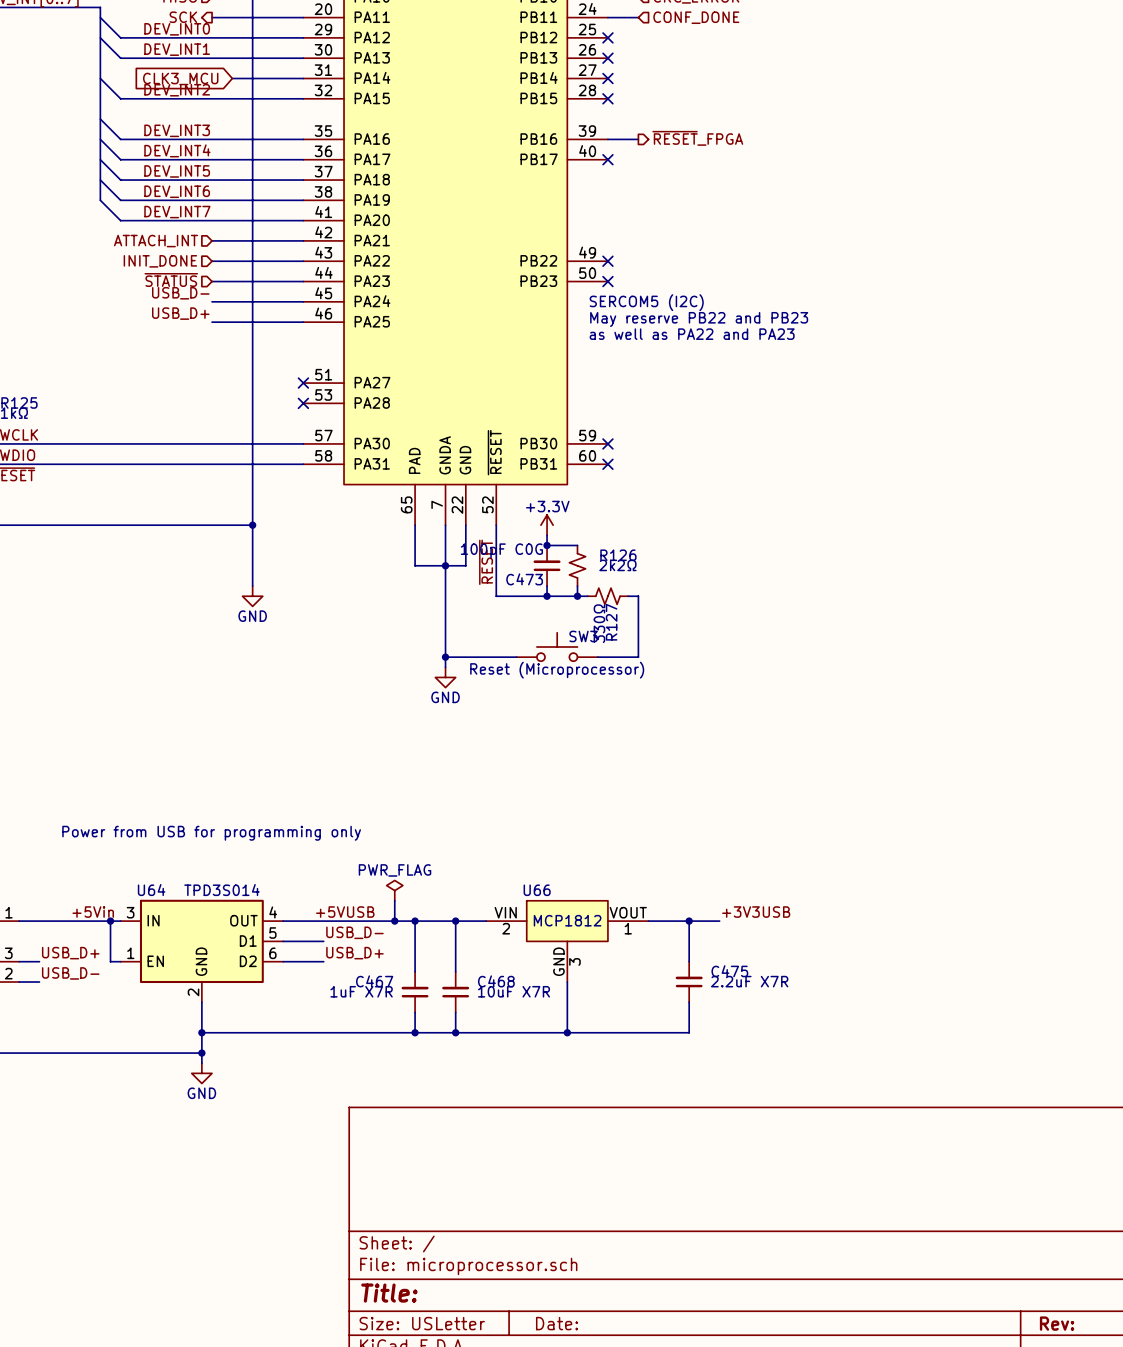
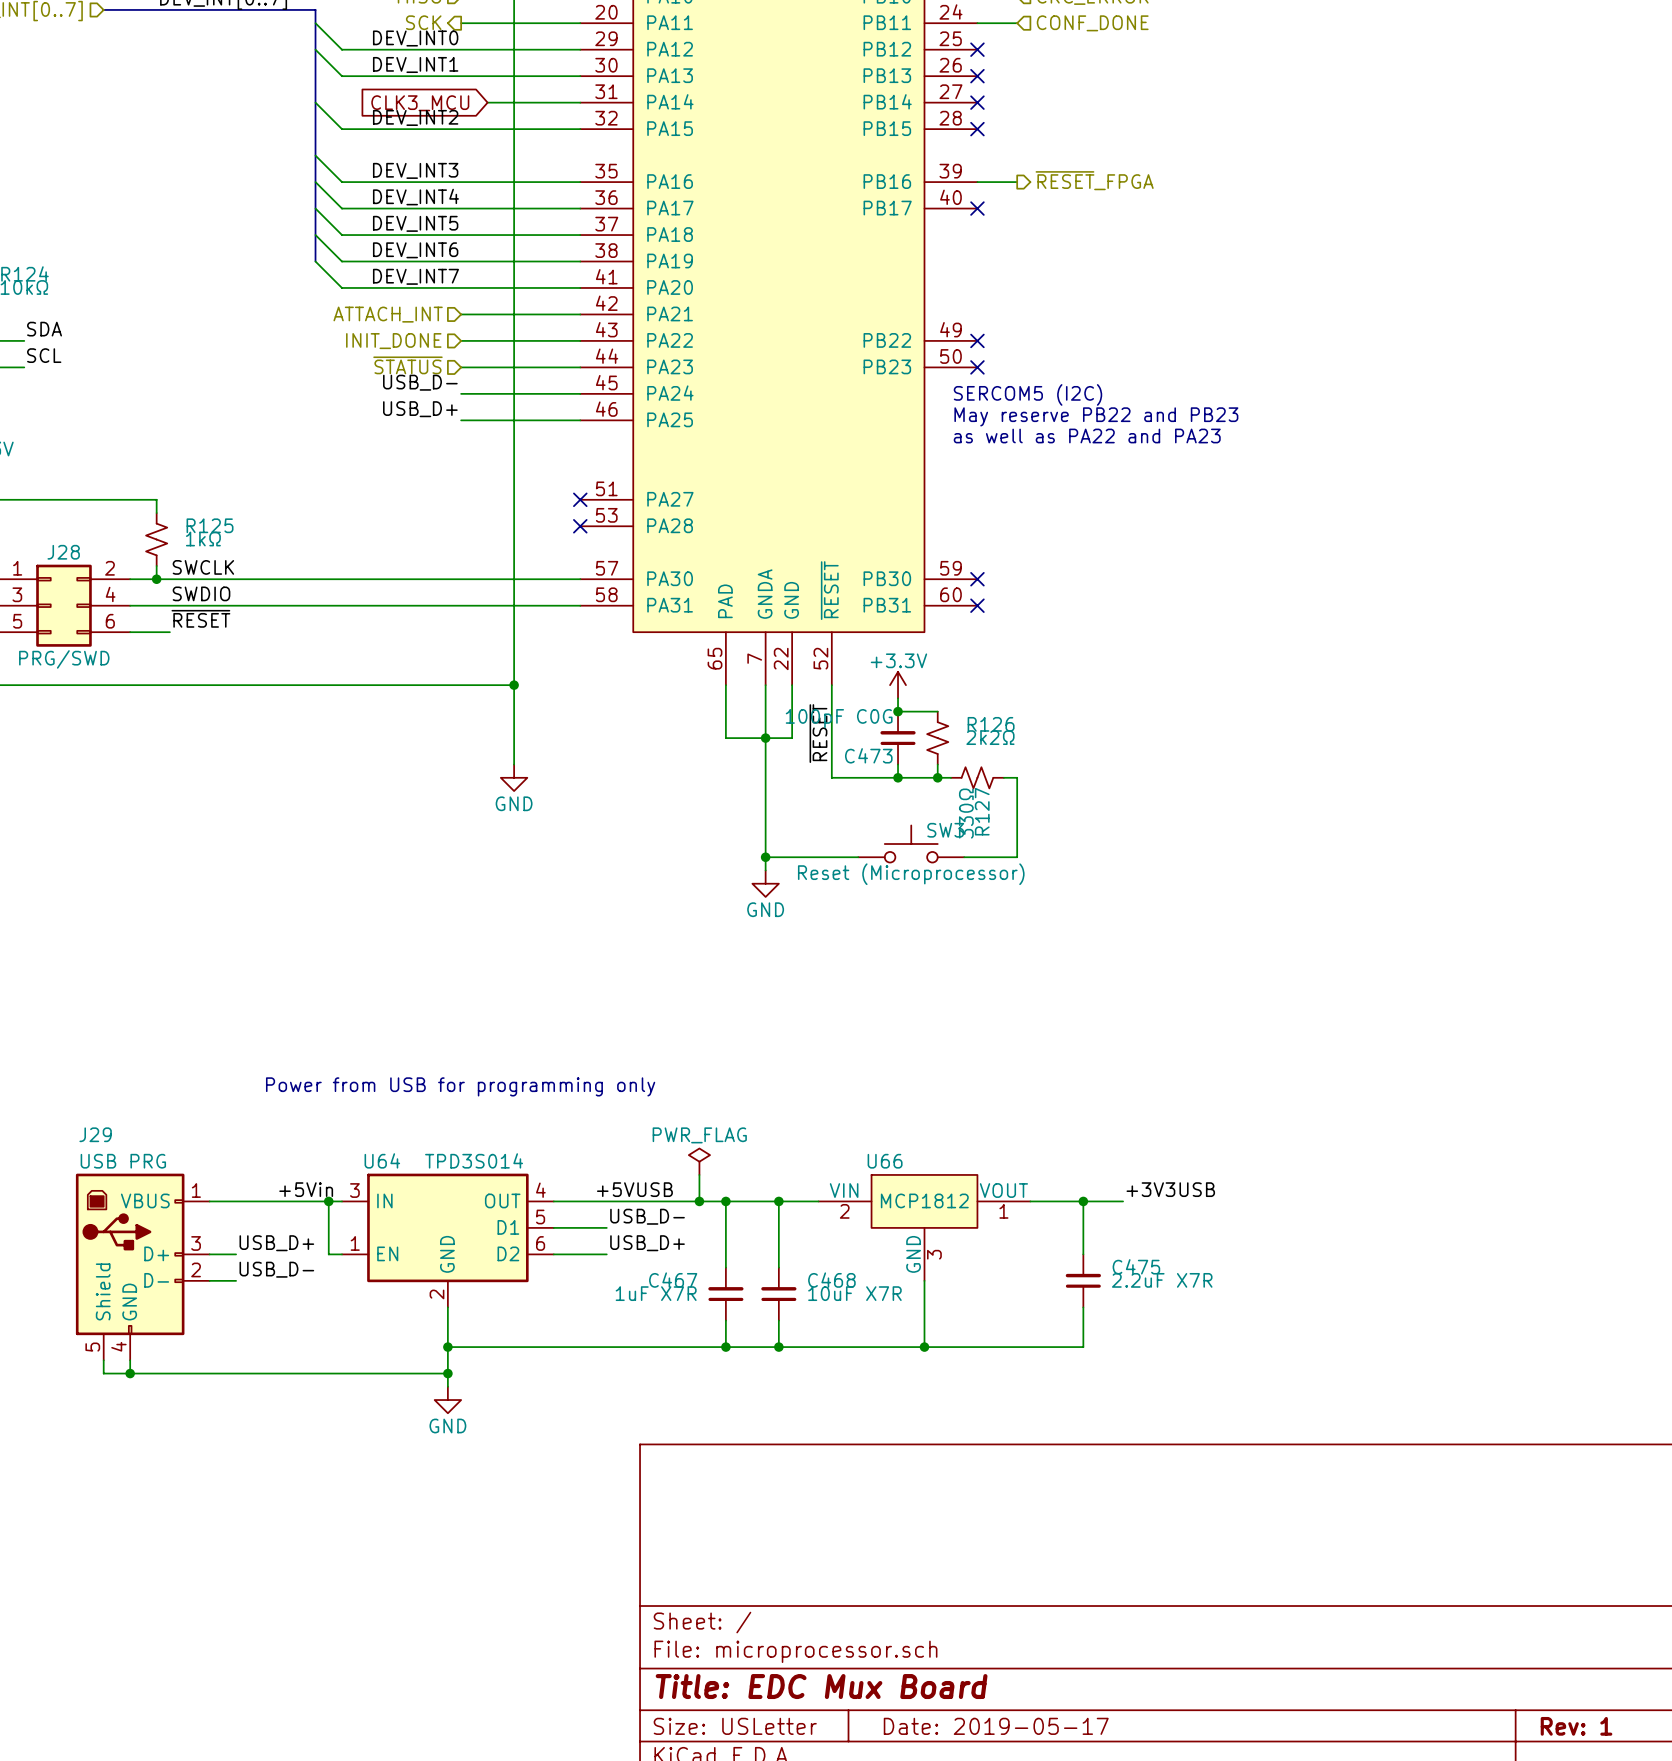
title block: Title: (389, 1293) -> Title: EDC Mux Board (821, 1686)
title block: Date: (556, 1323) -> Date: 2019-05-17 (996, 1726)
title block: Rev: (1057, 1323) -> Rev: 1 (1576, 1726)

